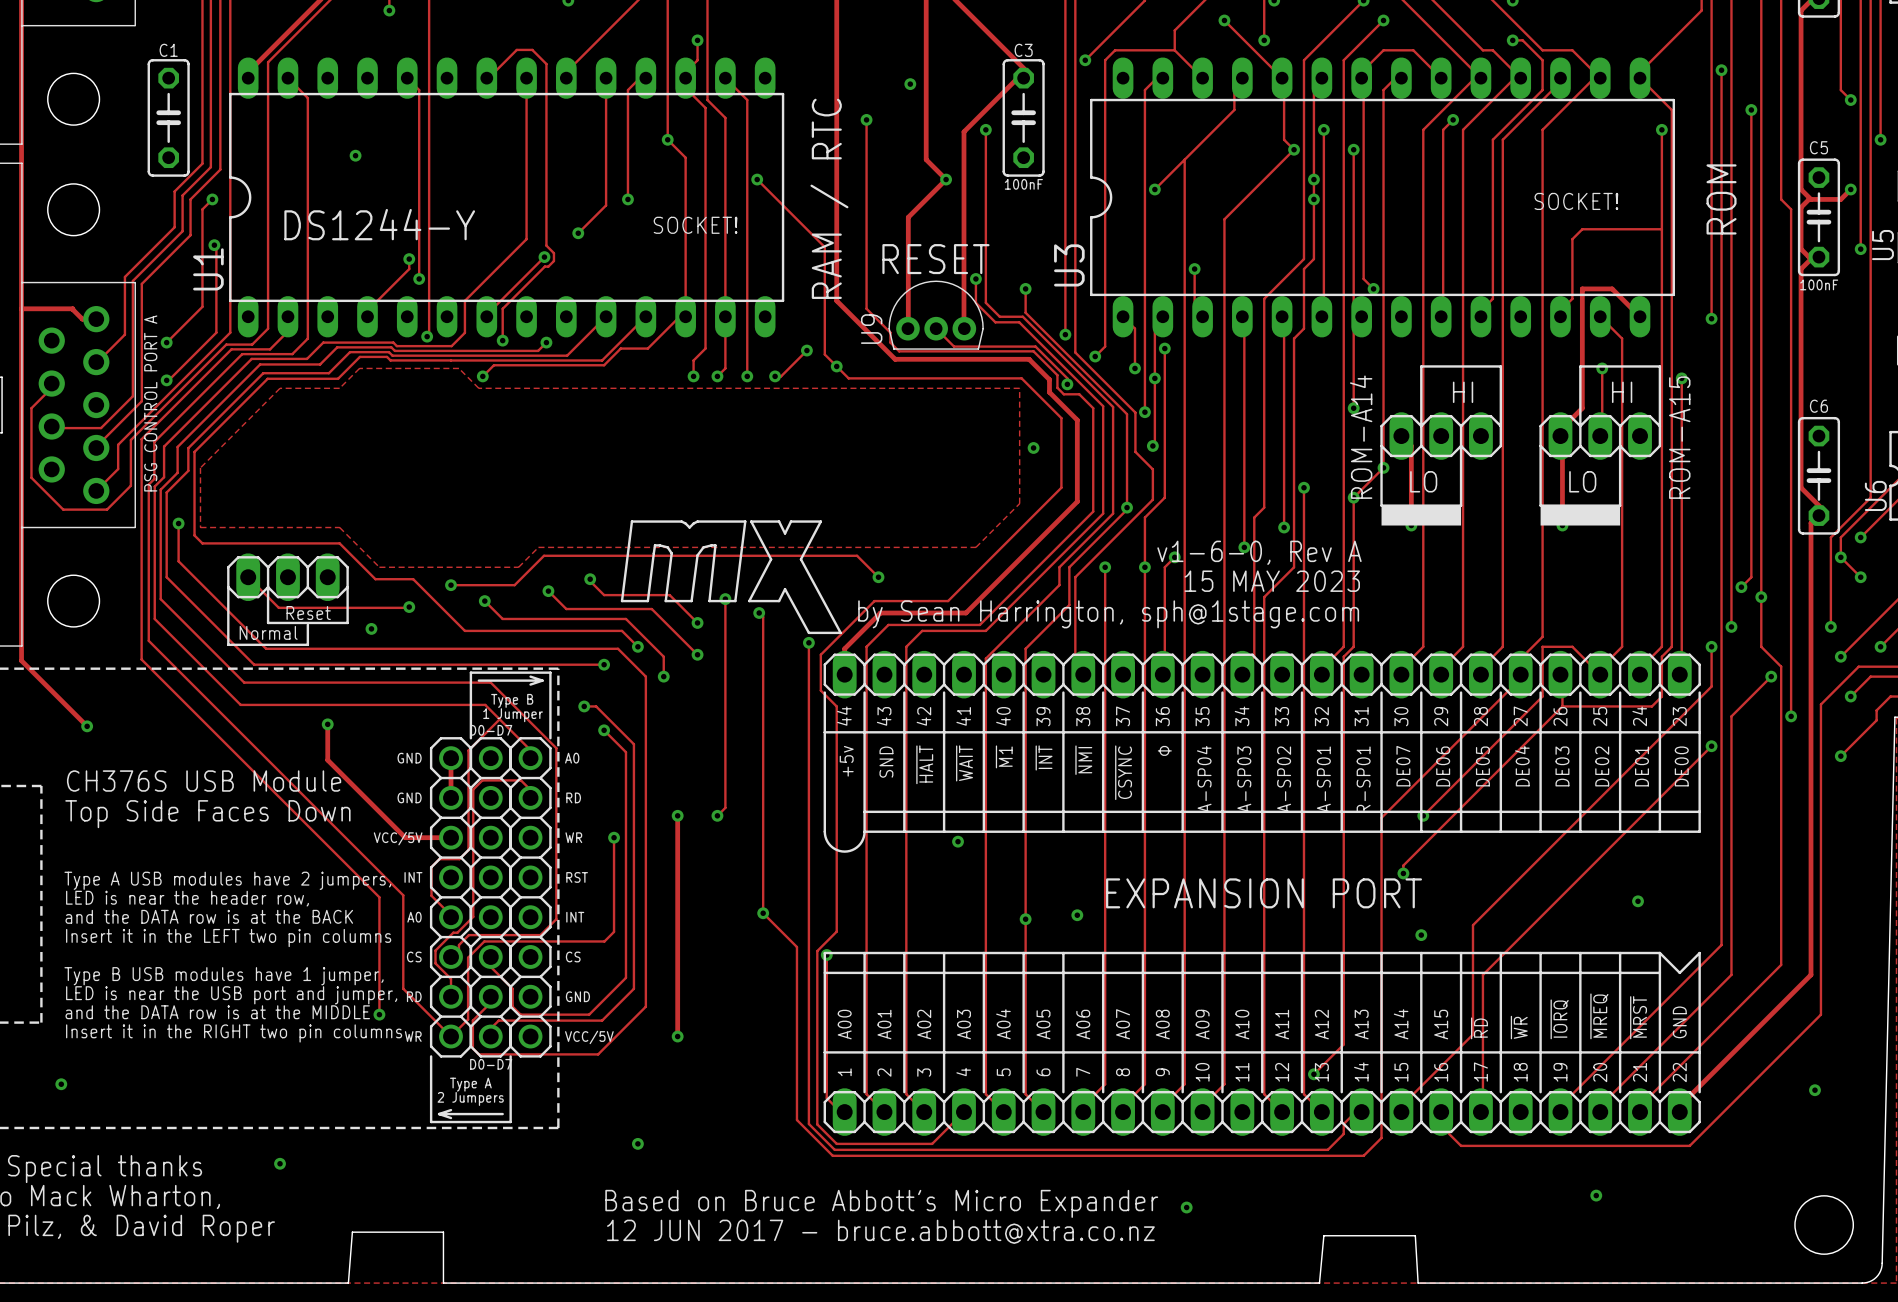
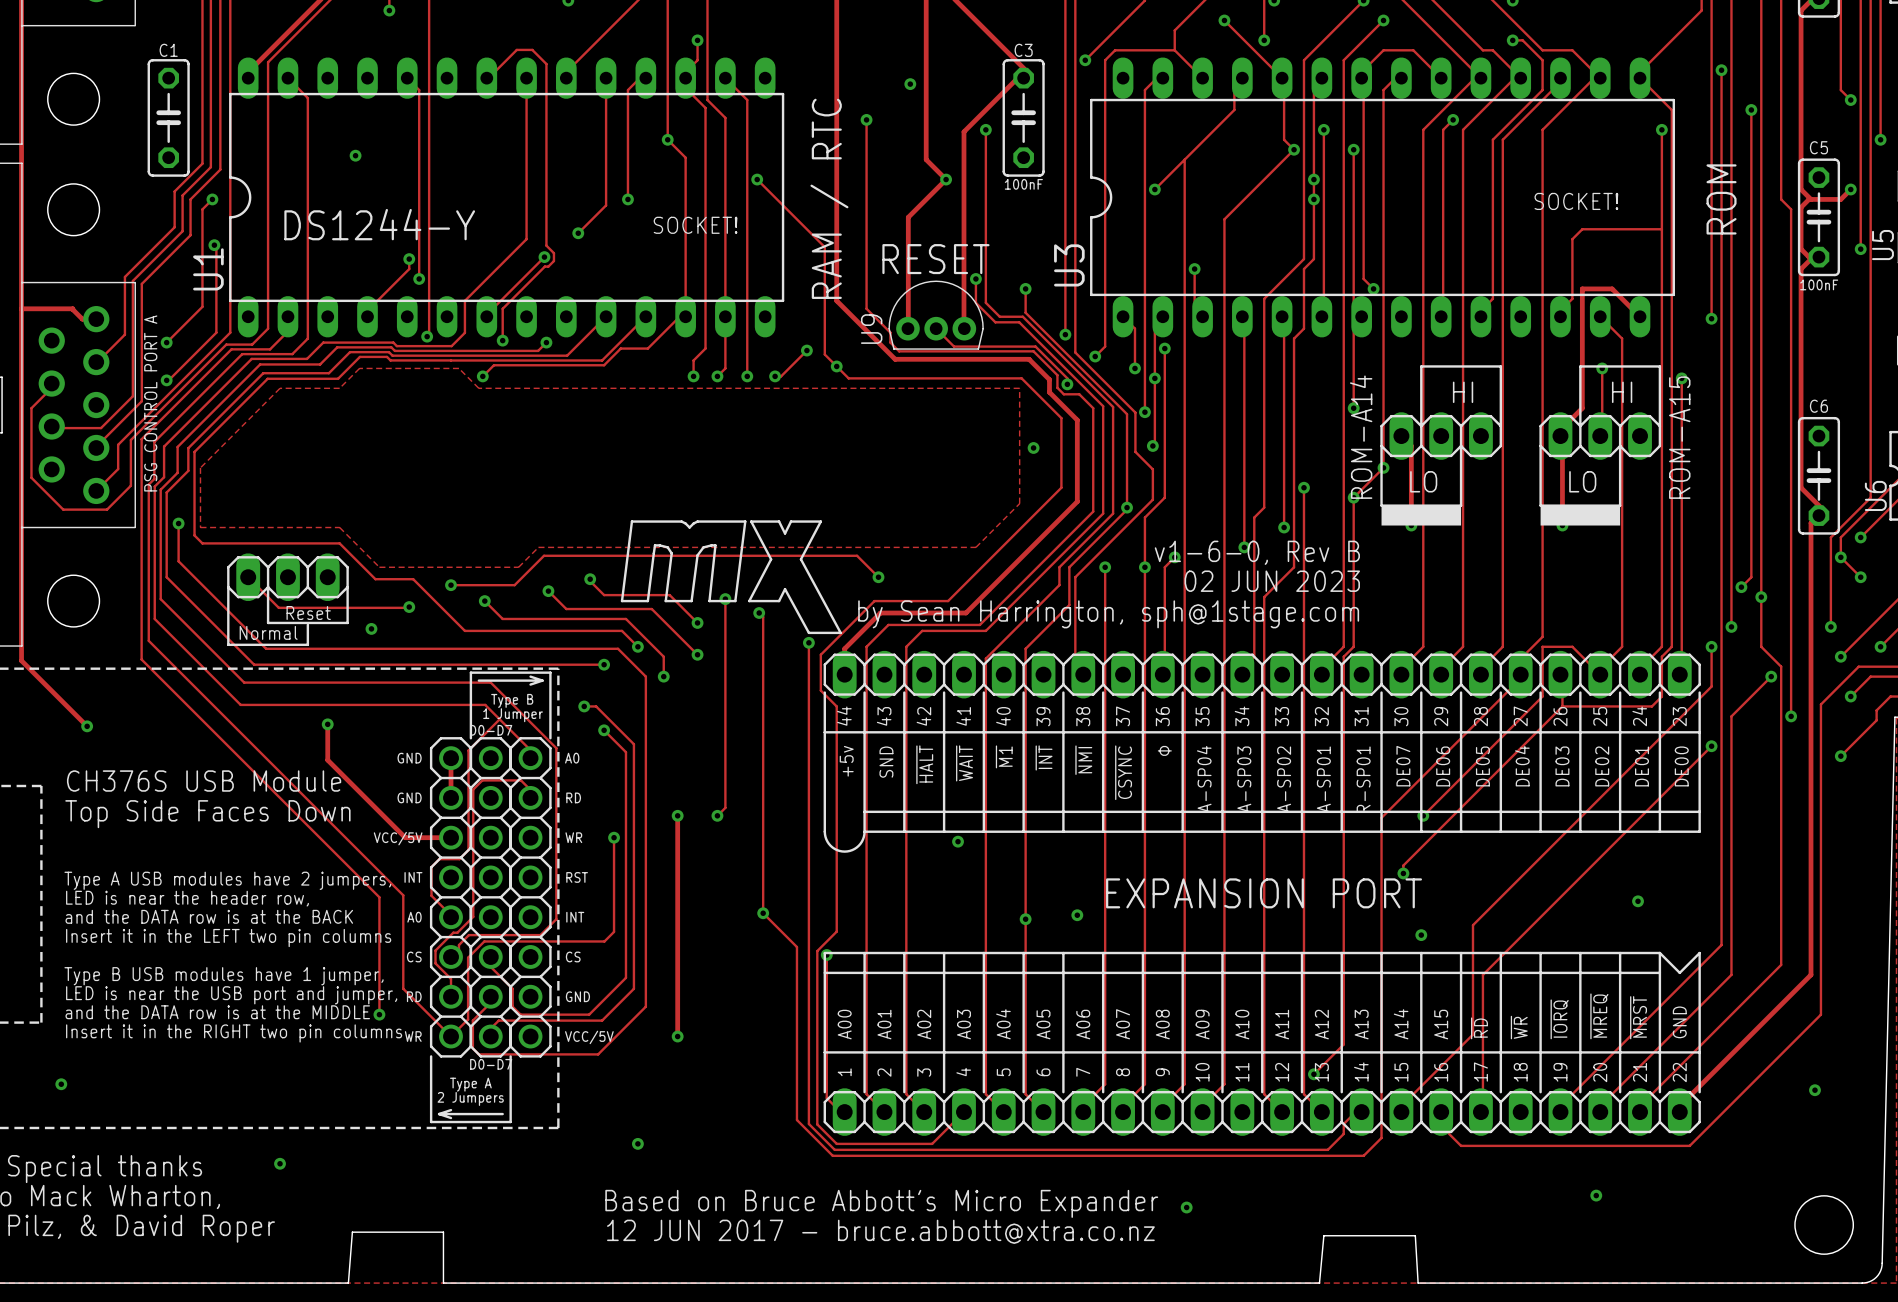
text: v1-6-0, Rev A (1259, 552) -> v1-6-0, Rev B (1257, 552)
text: 15 MAY 2023 (1272, 581) -> 02 JUN 2023 (1272, 581)

